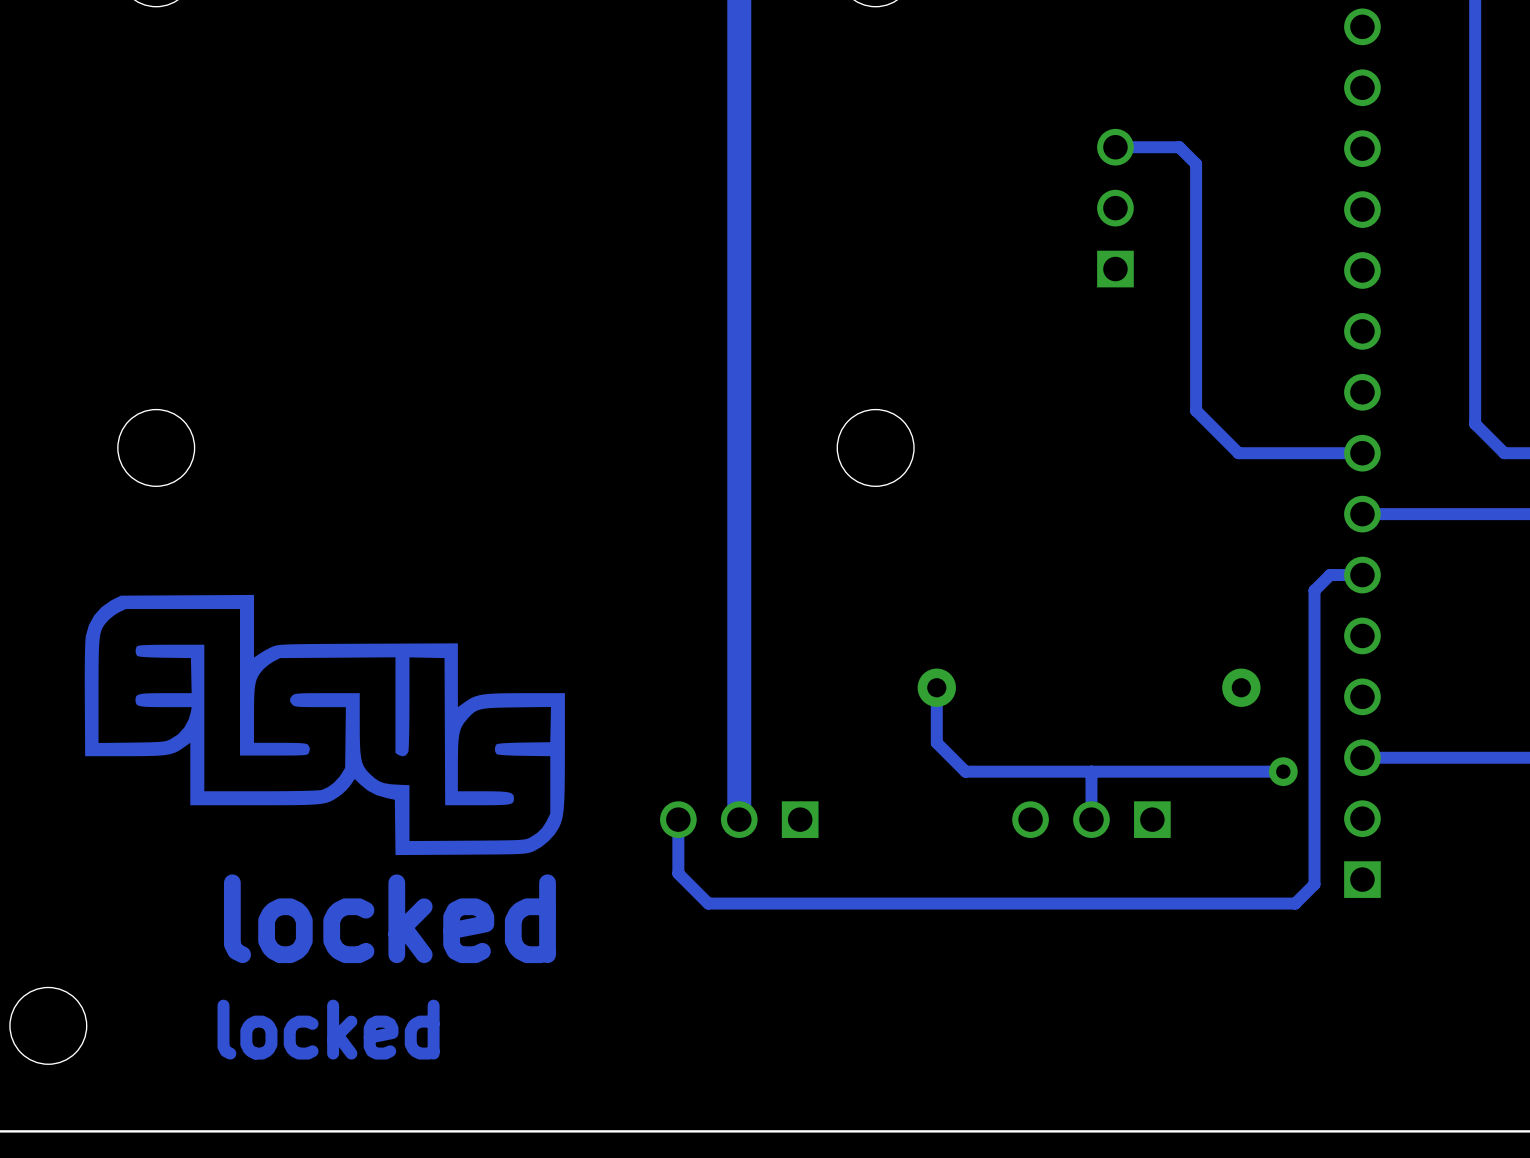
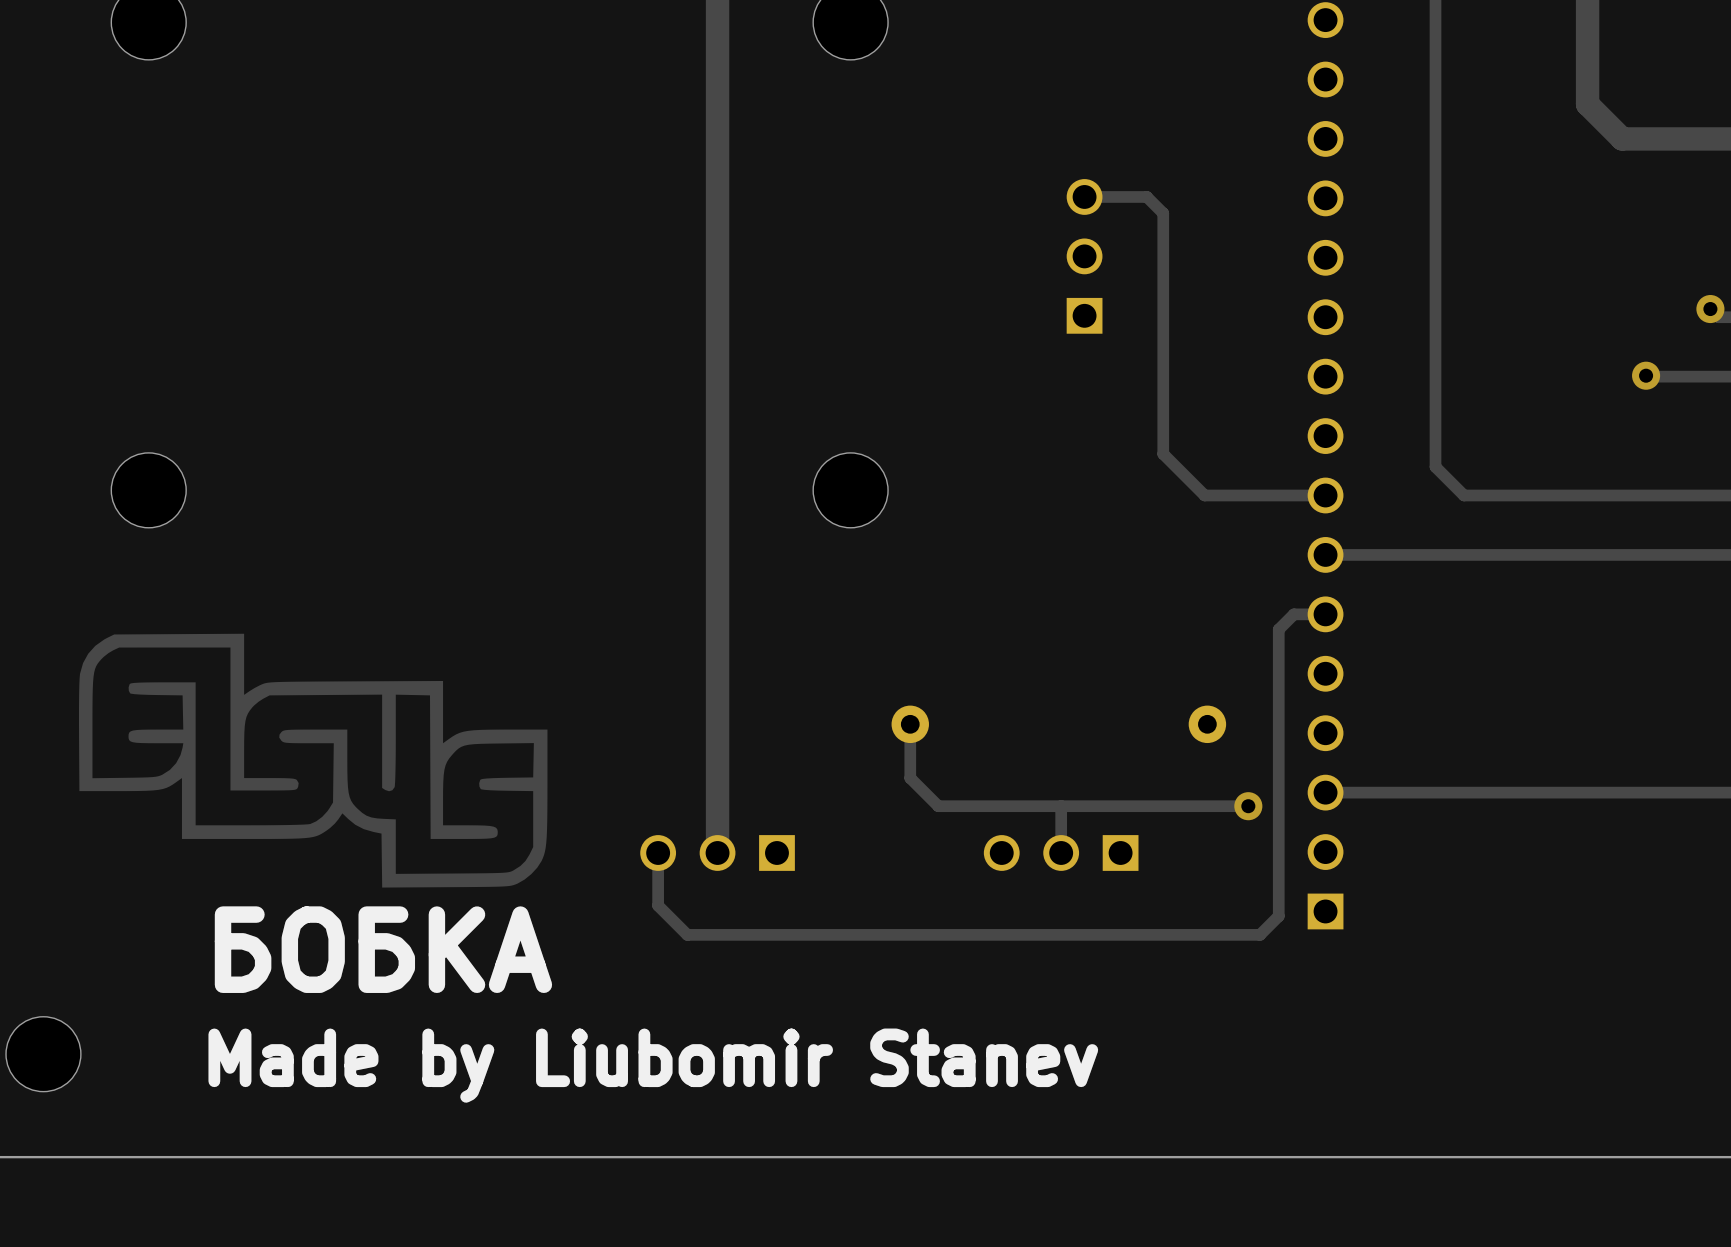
text: locked (389, 918) -> none
text: none -> БОБКА (383, 949)
text: locked (328, 1029) -> none
text: none -> Made by Liubomir Stanev (653, 1065)

